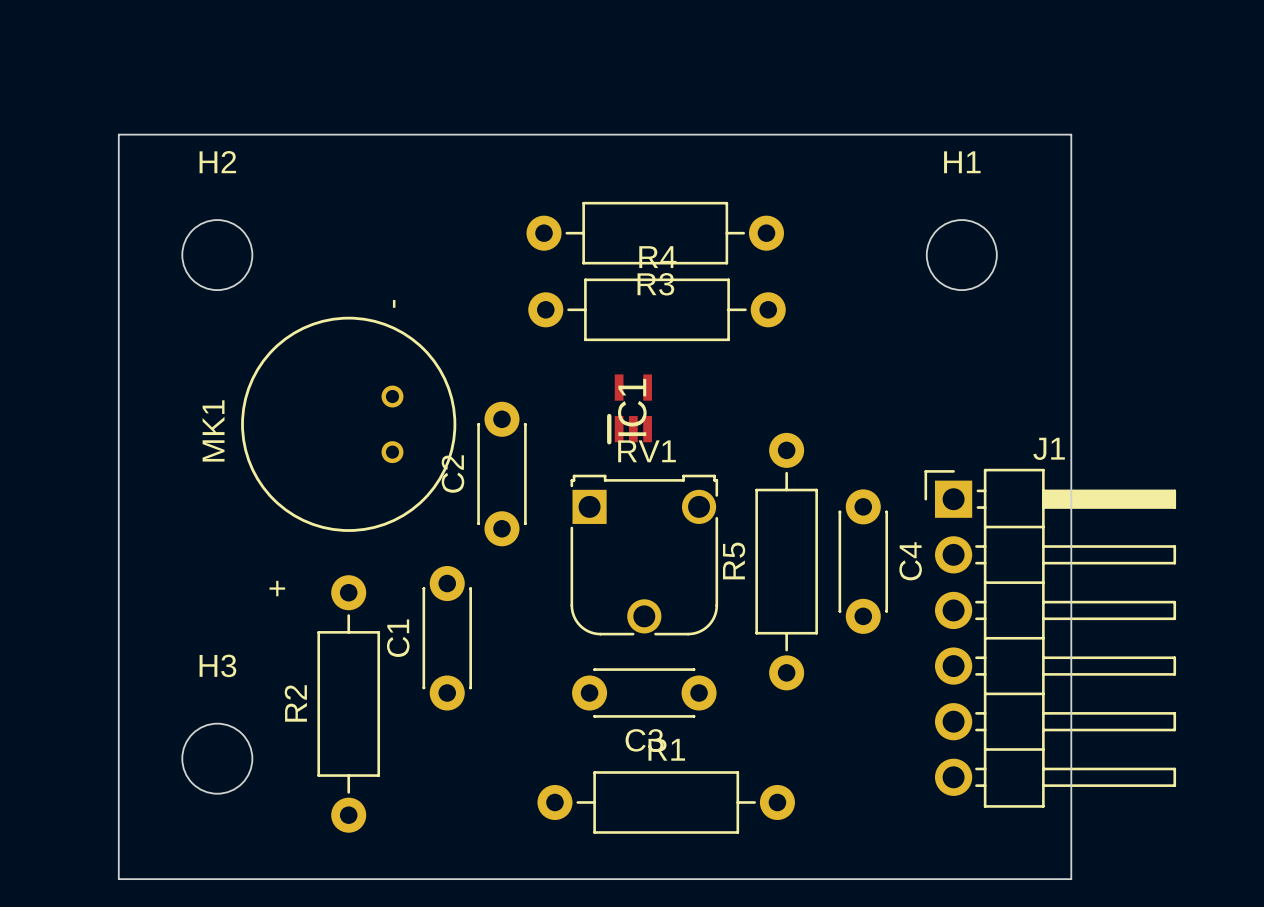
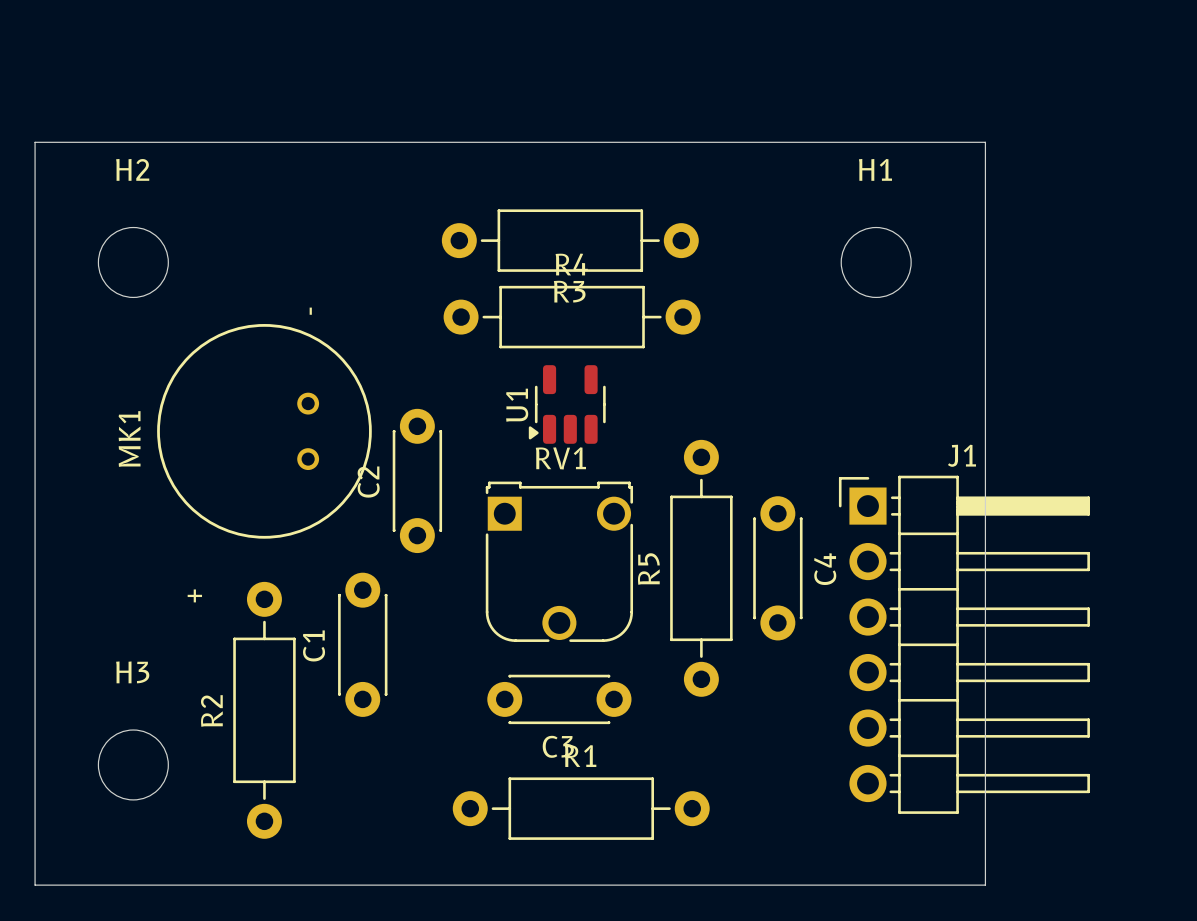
U1: none -> (567, 404)
IC1: (629, 409) -> none

